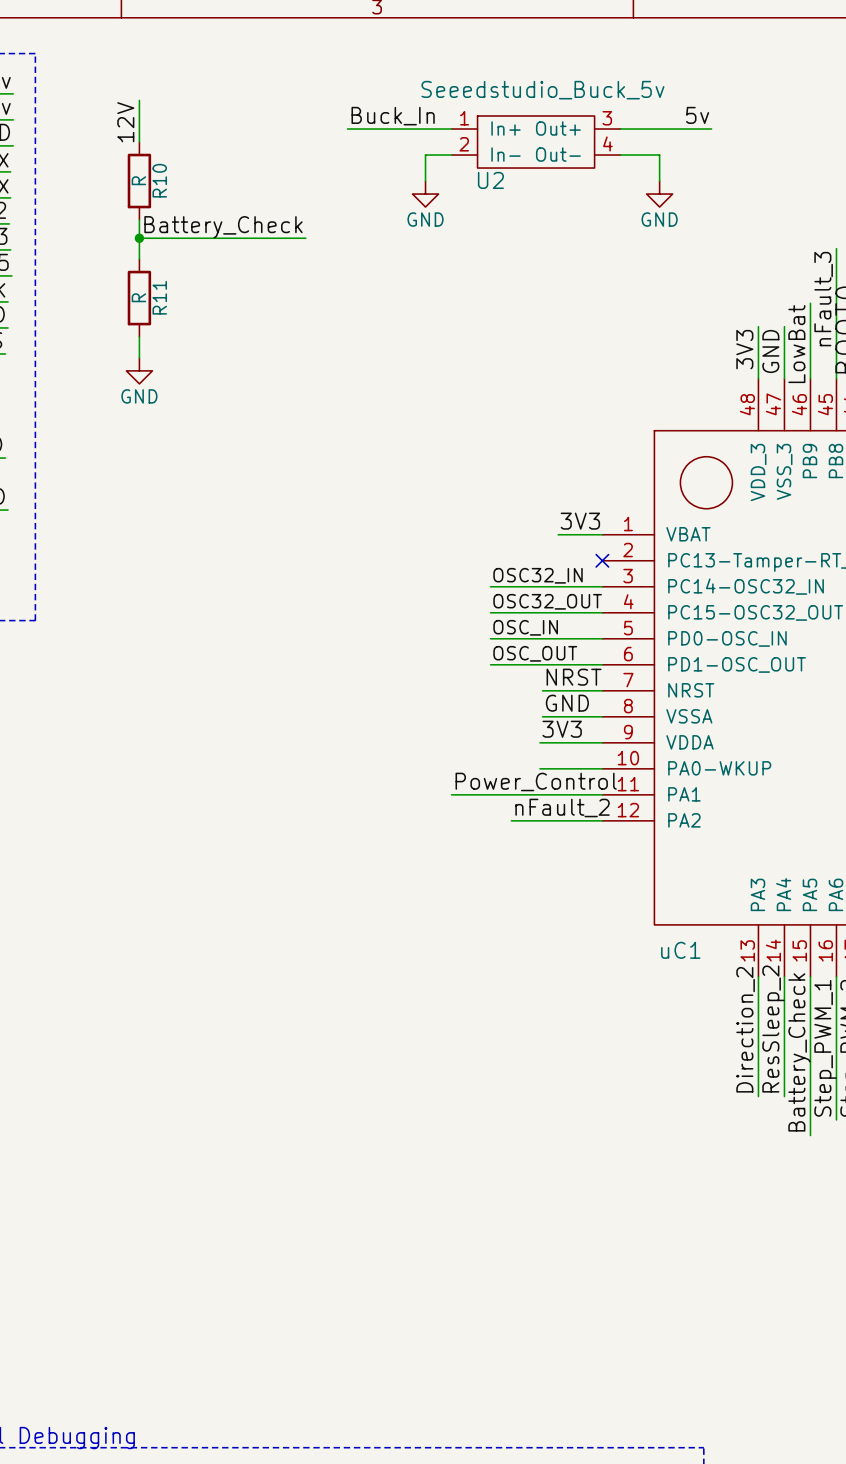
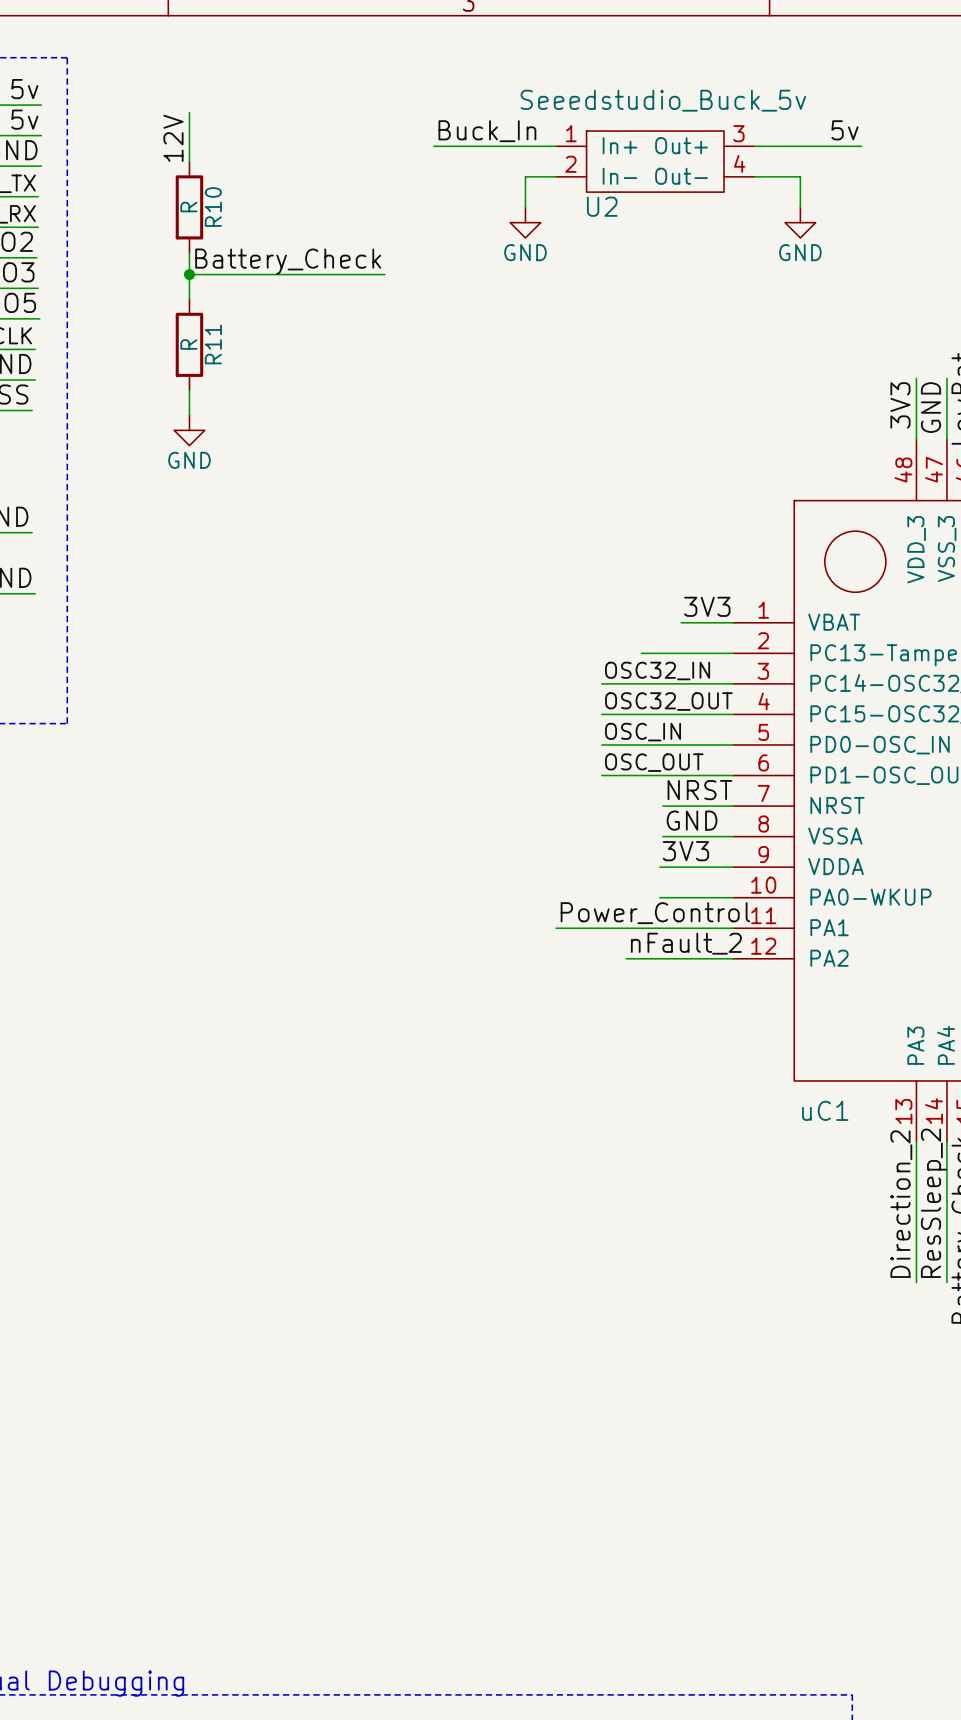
wire: none -> (641, 653) (733, 653)
no-connect mark: (602, 560) -> none

